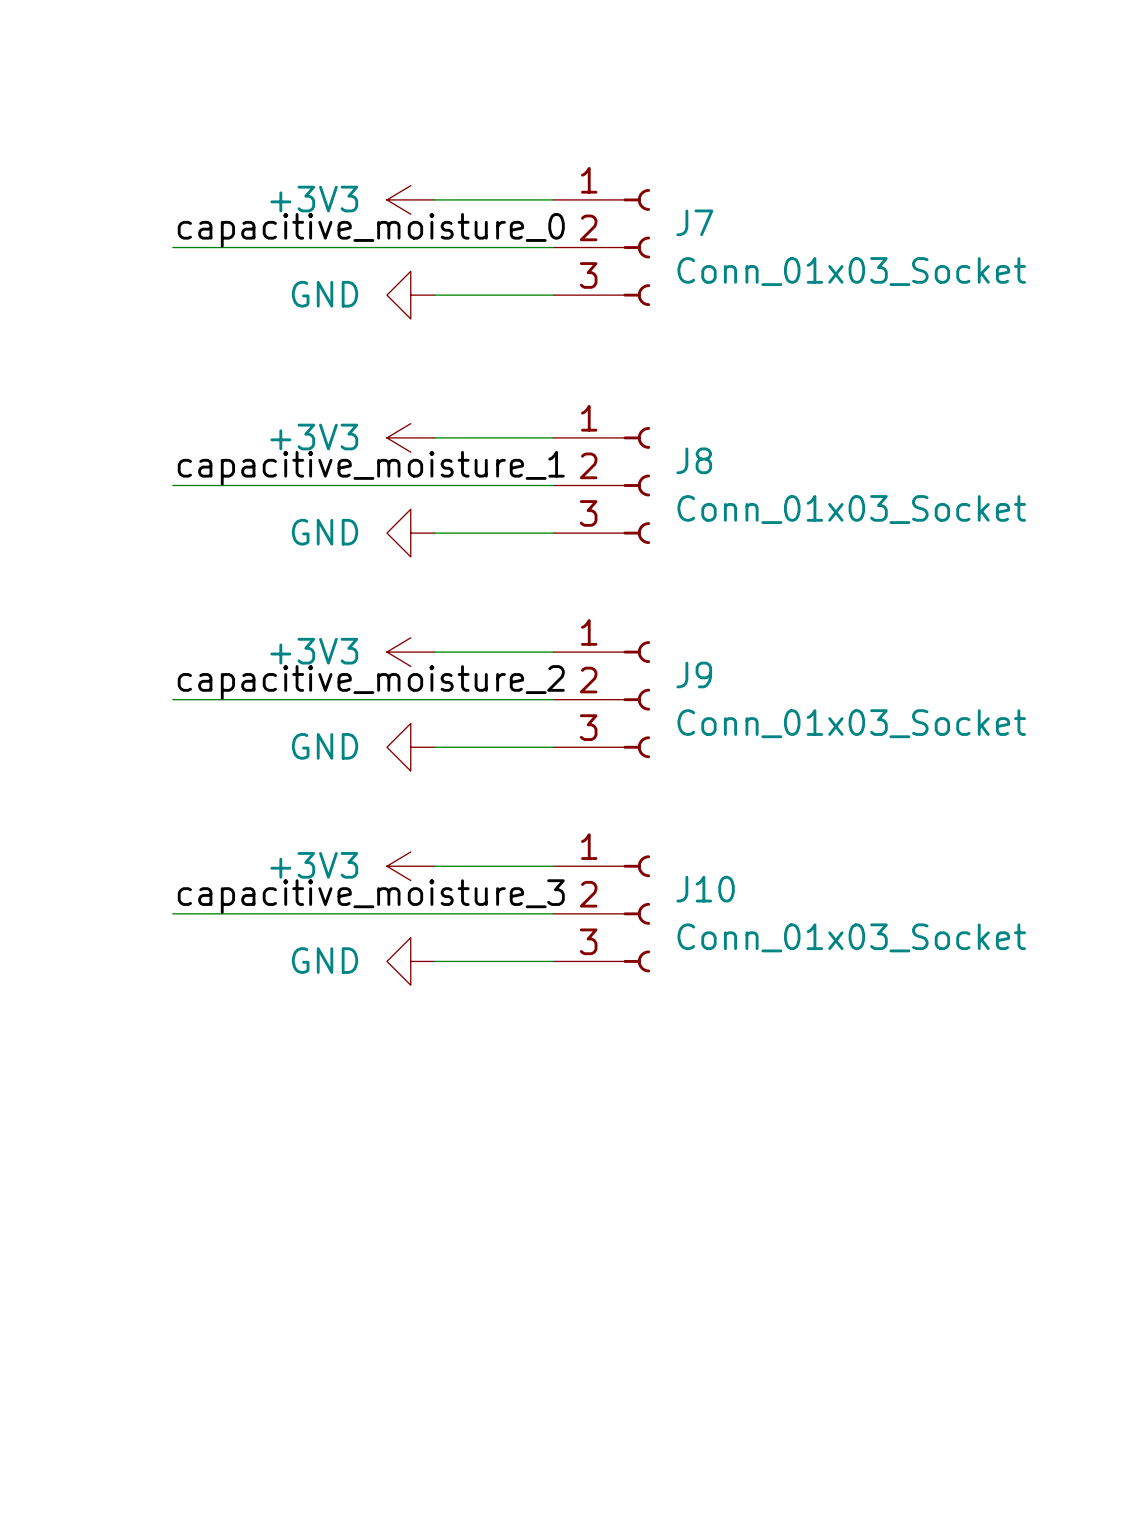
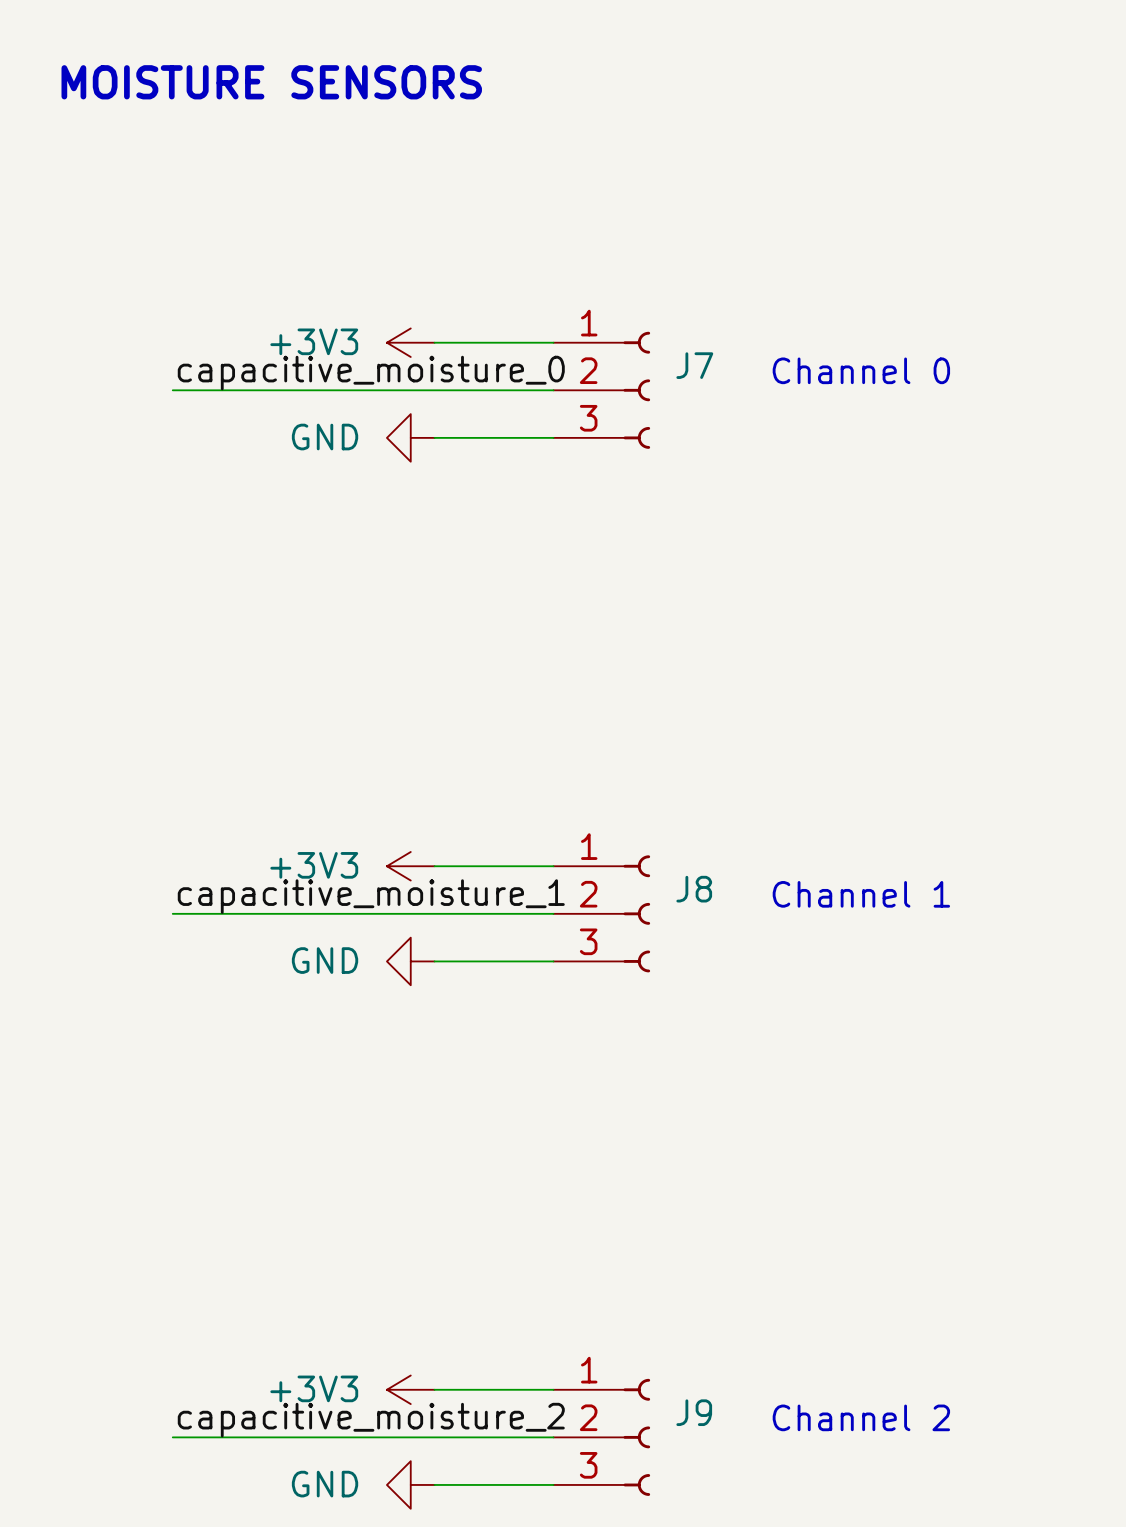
text: none -> MOISTURE SENSORS (271, 82)
power symbol position: +3V3 (410, 199) -> +3V3 (410, 342)
wire: (434, 199) (553, 199) -> (434, 342) (553, 342)
label position: capacitive_moisture_0 (371, 230) -> capacitive_moisture_0 (371, 373)
wire: (172, 247) (553, 247) -> (172, 390) (553, 390)
J7 position: (601, 247) -> (601, 390)
J7 value: Conn_01x03_Socket (851, 271) -> none
power symbol: GND (410, 295) -> none
wire: (434, 295) (553, 295) -> none
text: none -> Channel 0 (861, 370)
power symbol: +3V3 (410, 437) -> GND (410, 437)
label: capacitive_moisture_1 (371, 468) -> none
wire: (172, 485) (553, 485) -> none
J8: Conn_01x03_Socket (601, 485) -> none
power symbol: GND (410, 533) -> none
wire: (434, 533) (553, 533) -> none
power symbol: +3V3 (410, 652) -> none
wire: (434, 652) (553, 652) -> none
label: capacitive_moisture_2 (371, 682) -> none
wire: (172, 699) (553, 699) -> none
J9 position: (601, 699) -> (601, 1437)
J9 value: Conn_01x03_Socket (851, 723) -> none
power symbol: GND (410, 747) -> none
wire: (434, 747) (553, 747) -> none
J10 name: J10 (705, 889) -> J8 (694, 889)
text: none -> Channel 1 (861, 894)
label: capacitive_moisture_3 (371, 896) -> capacitive_moisture_1 (371, 896)
J10 value: Conn_01x03_Socket (851, 937) -> none
power symbol: none -> +3V3 (410, 1389)
wire: none -> (434, 1389) (553, 1389)
text: none -> Channel 2 (861, 1417)
label: none -> capacitive_moisture_2 (371, 1420)
wire: none -> (172, 1437) (553, 1437)
power symbol: none -> GND (410, 1484)
wire: none -> (434, 1484) (553, 1484)

